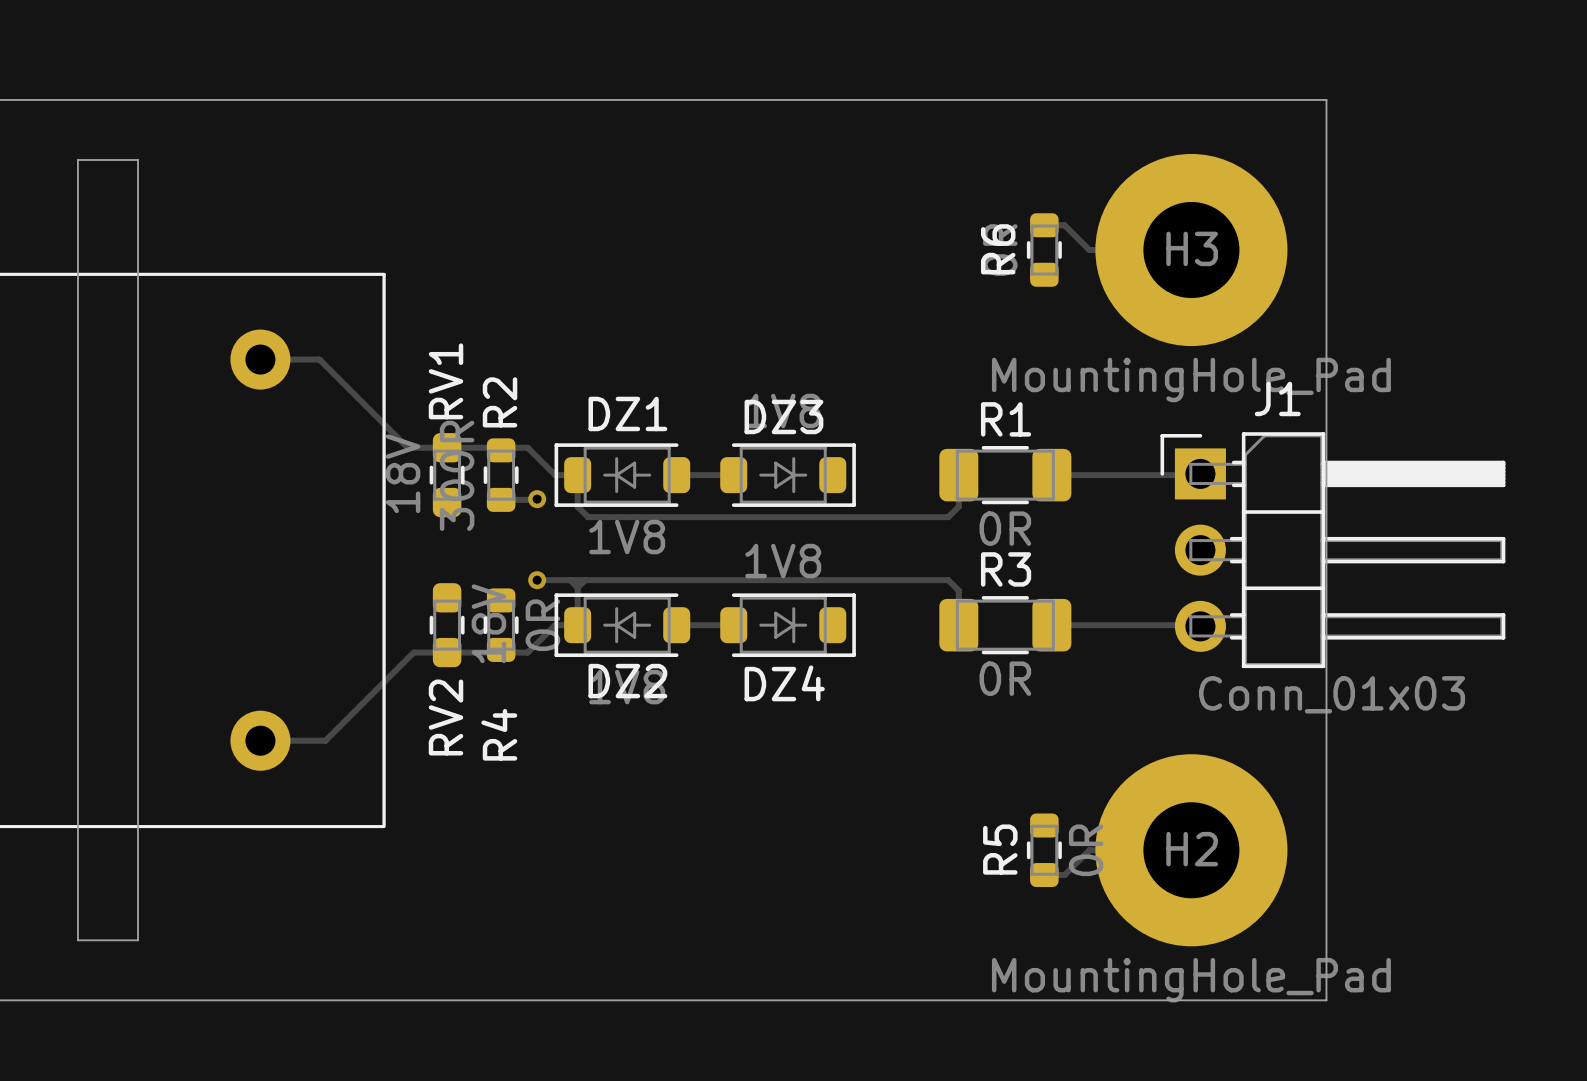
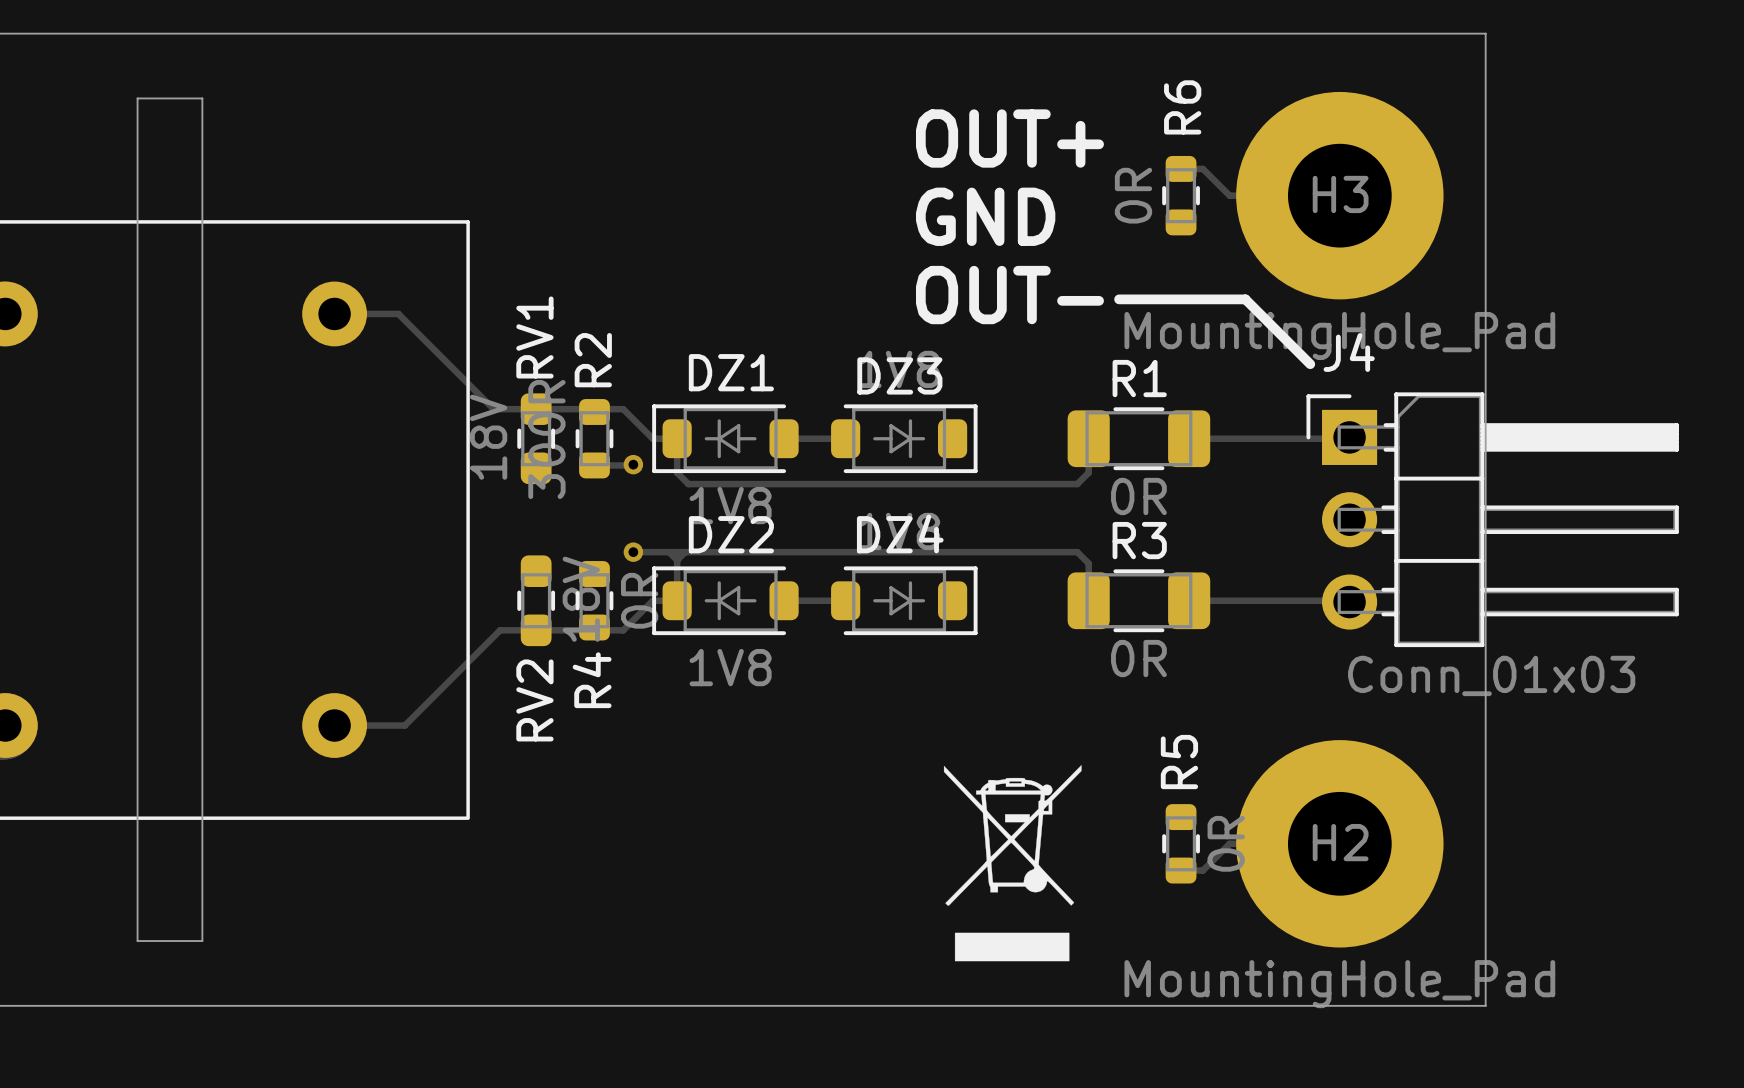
text: none -> OUT+ (1009, 138)
R6 name position: R6 (998, 249) -> R6 (1182, 107)
text: none -> GND (985, 216)
text: none -> OUT- (1009, 295)
line: none -> (1119, 299) (1245, 299) (1310, 364)
J1 name: J1 (1277, 398) -> J4 (1349, 352)
DZ2 name position: DZ2 (627, 681) -> DZ2 (731, 534)
DZ4 name position: DZ4 (784, 683) -> DZ4 (900, 533)
R4 name position: R4 (499, 734) -> R4 (592, 680)
drawing: none -> [943, 765, 1082, 962]
R5 name position: R5 (1000, 849) -> R5 (1179, 762)

